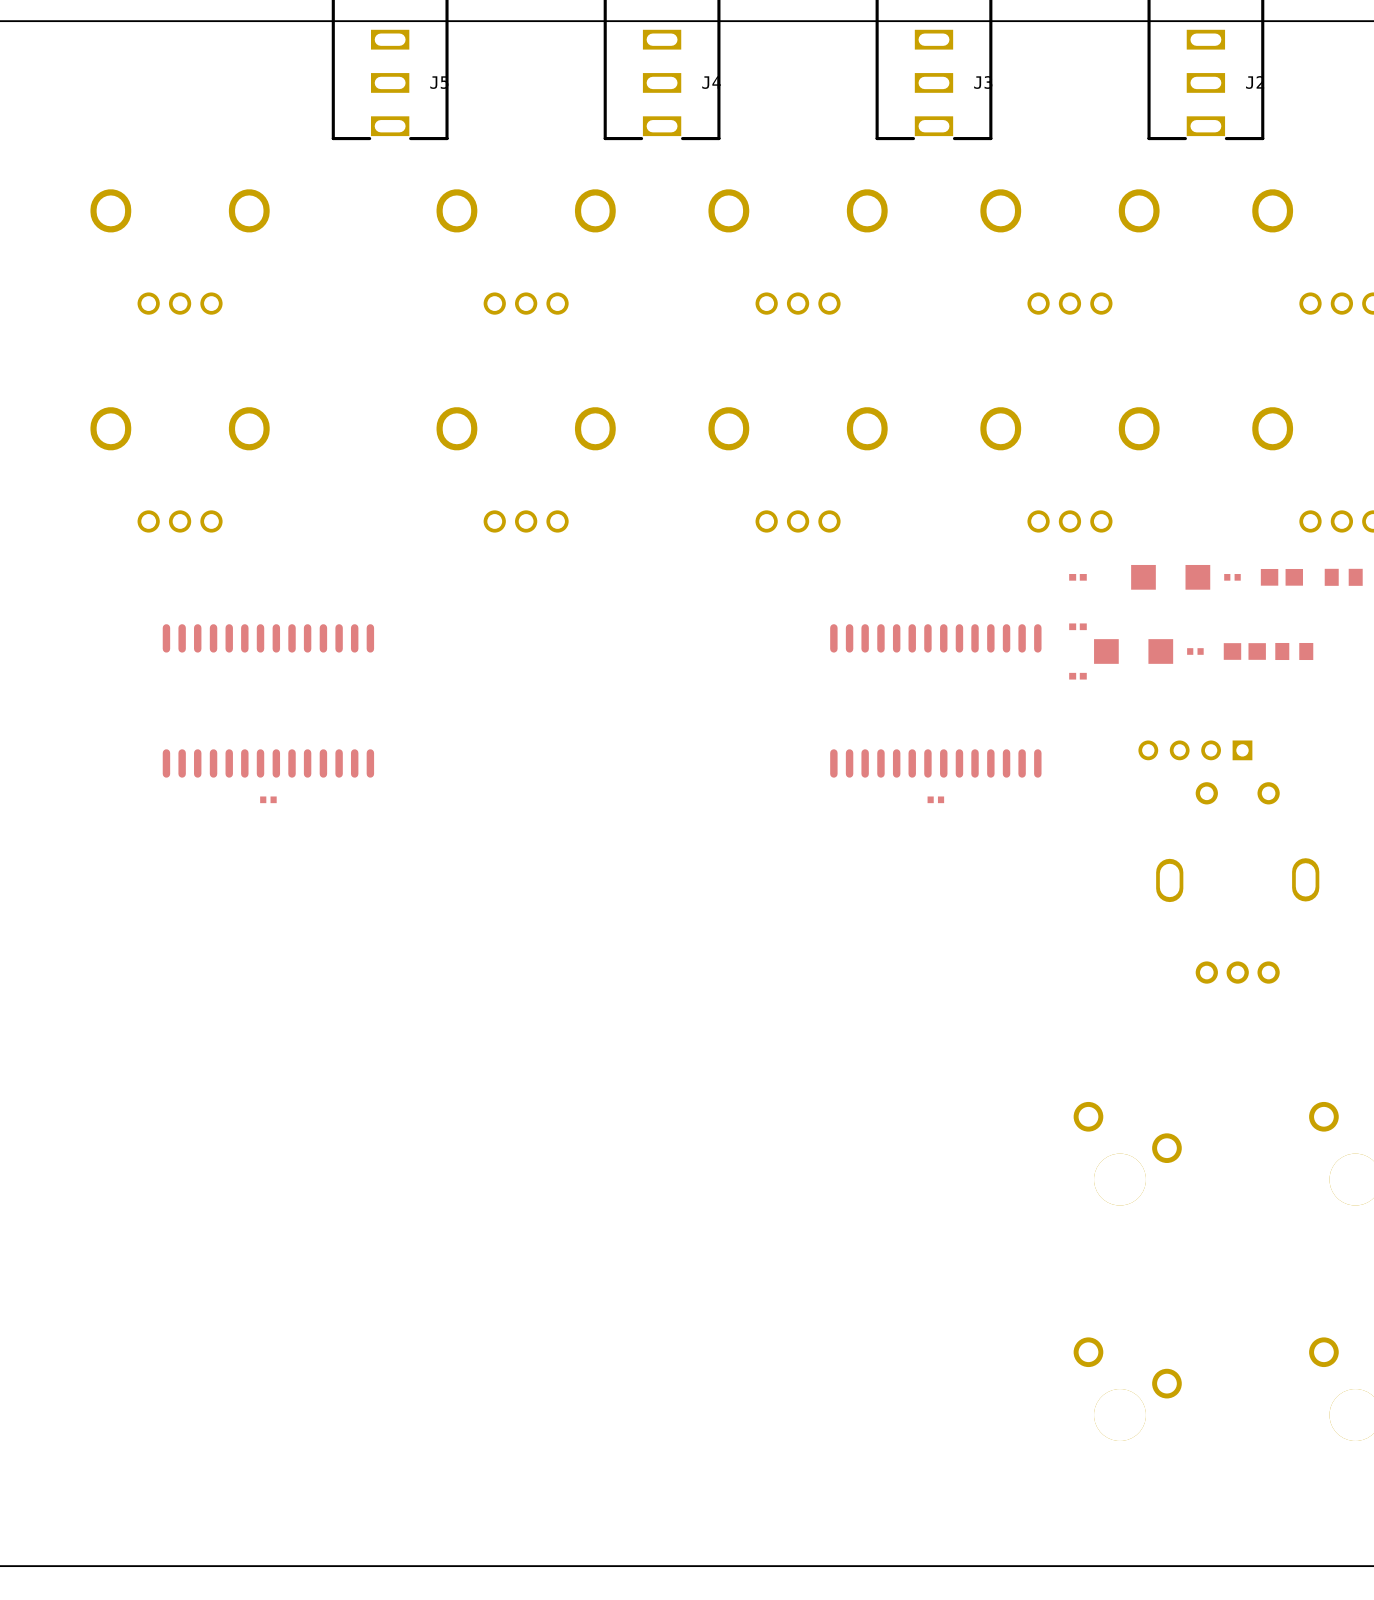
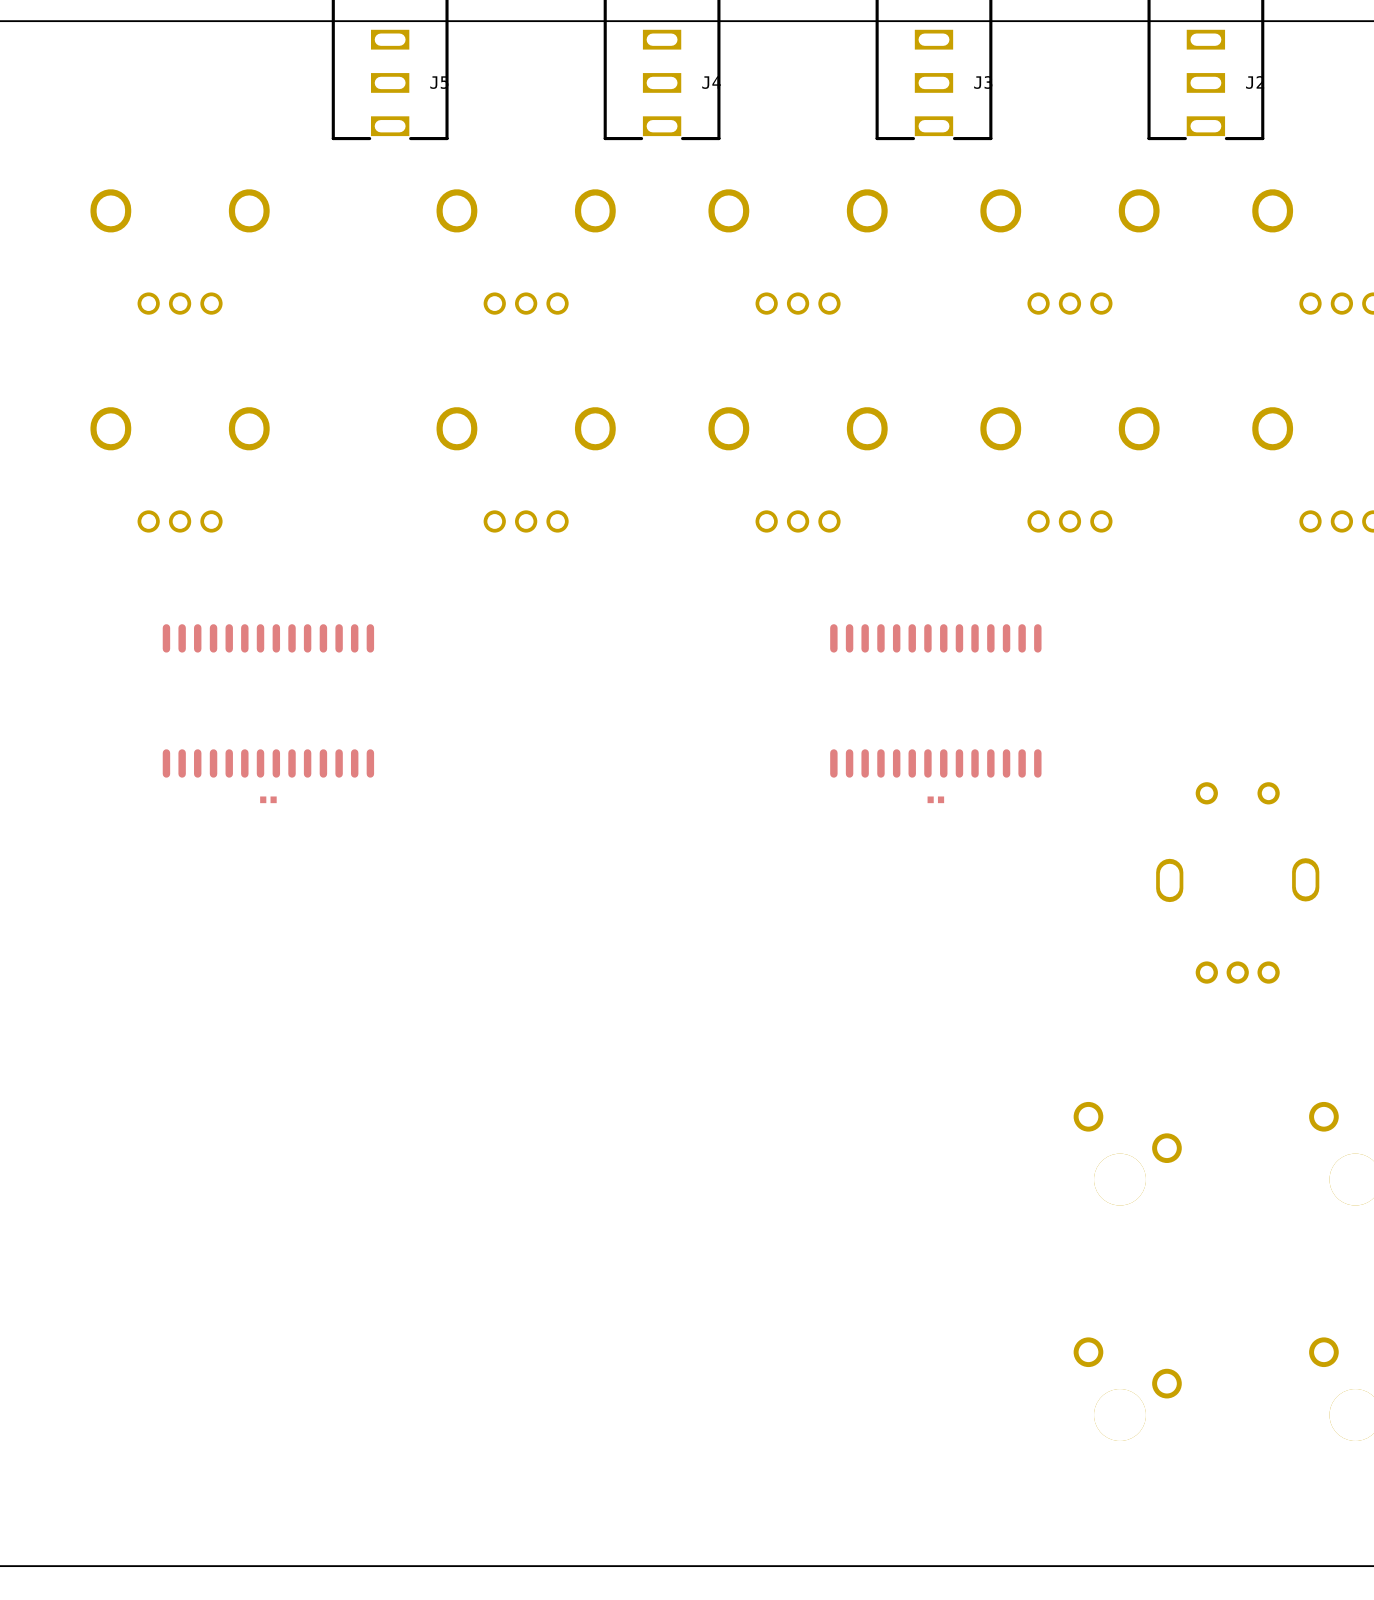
part: (1077, 577) -> none
part: (1170, 577) -> none
part: (1232, 577) -> none
part: (1281, 577) -> none
part: (1343, 577) -> none
part: (1077, 626) -> none
part: (1133, 651) -> none
part: (1195, 651) -> none
part: (1244, 651) -> none
part: (1294, 651) -> none
part: (1077, 676) -> none
part: (1195, 750) -> none

